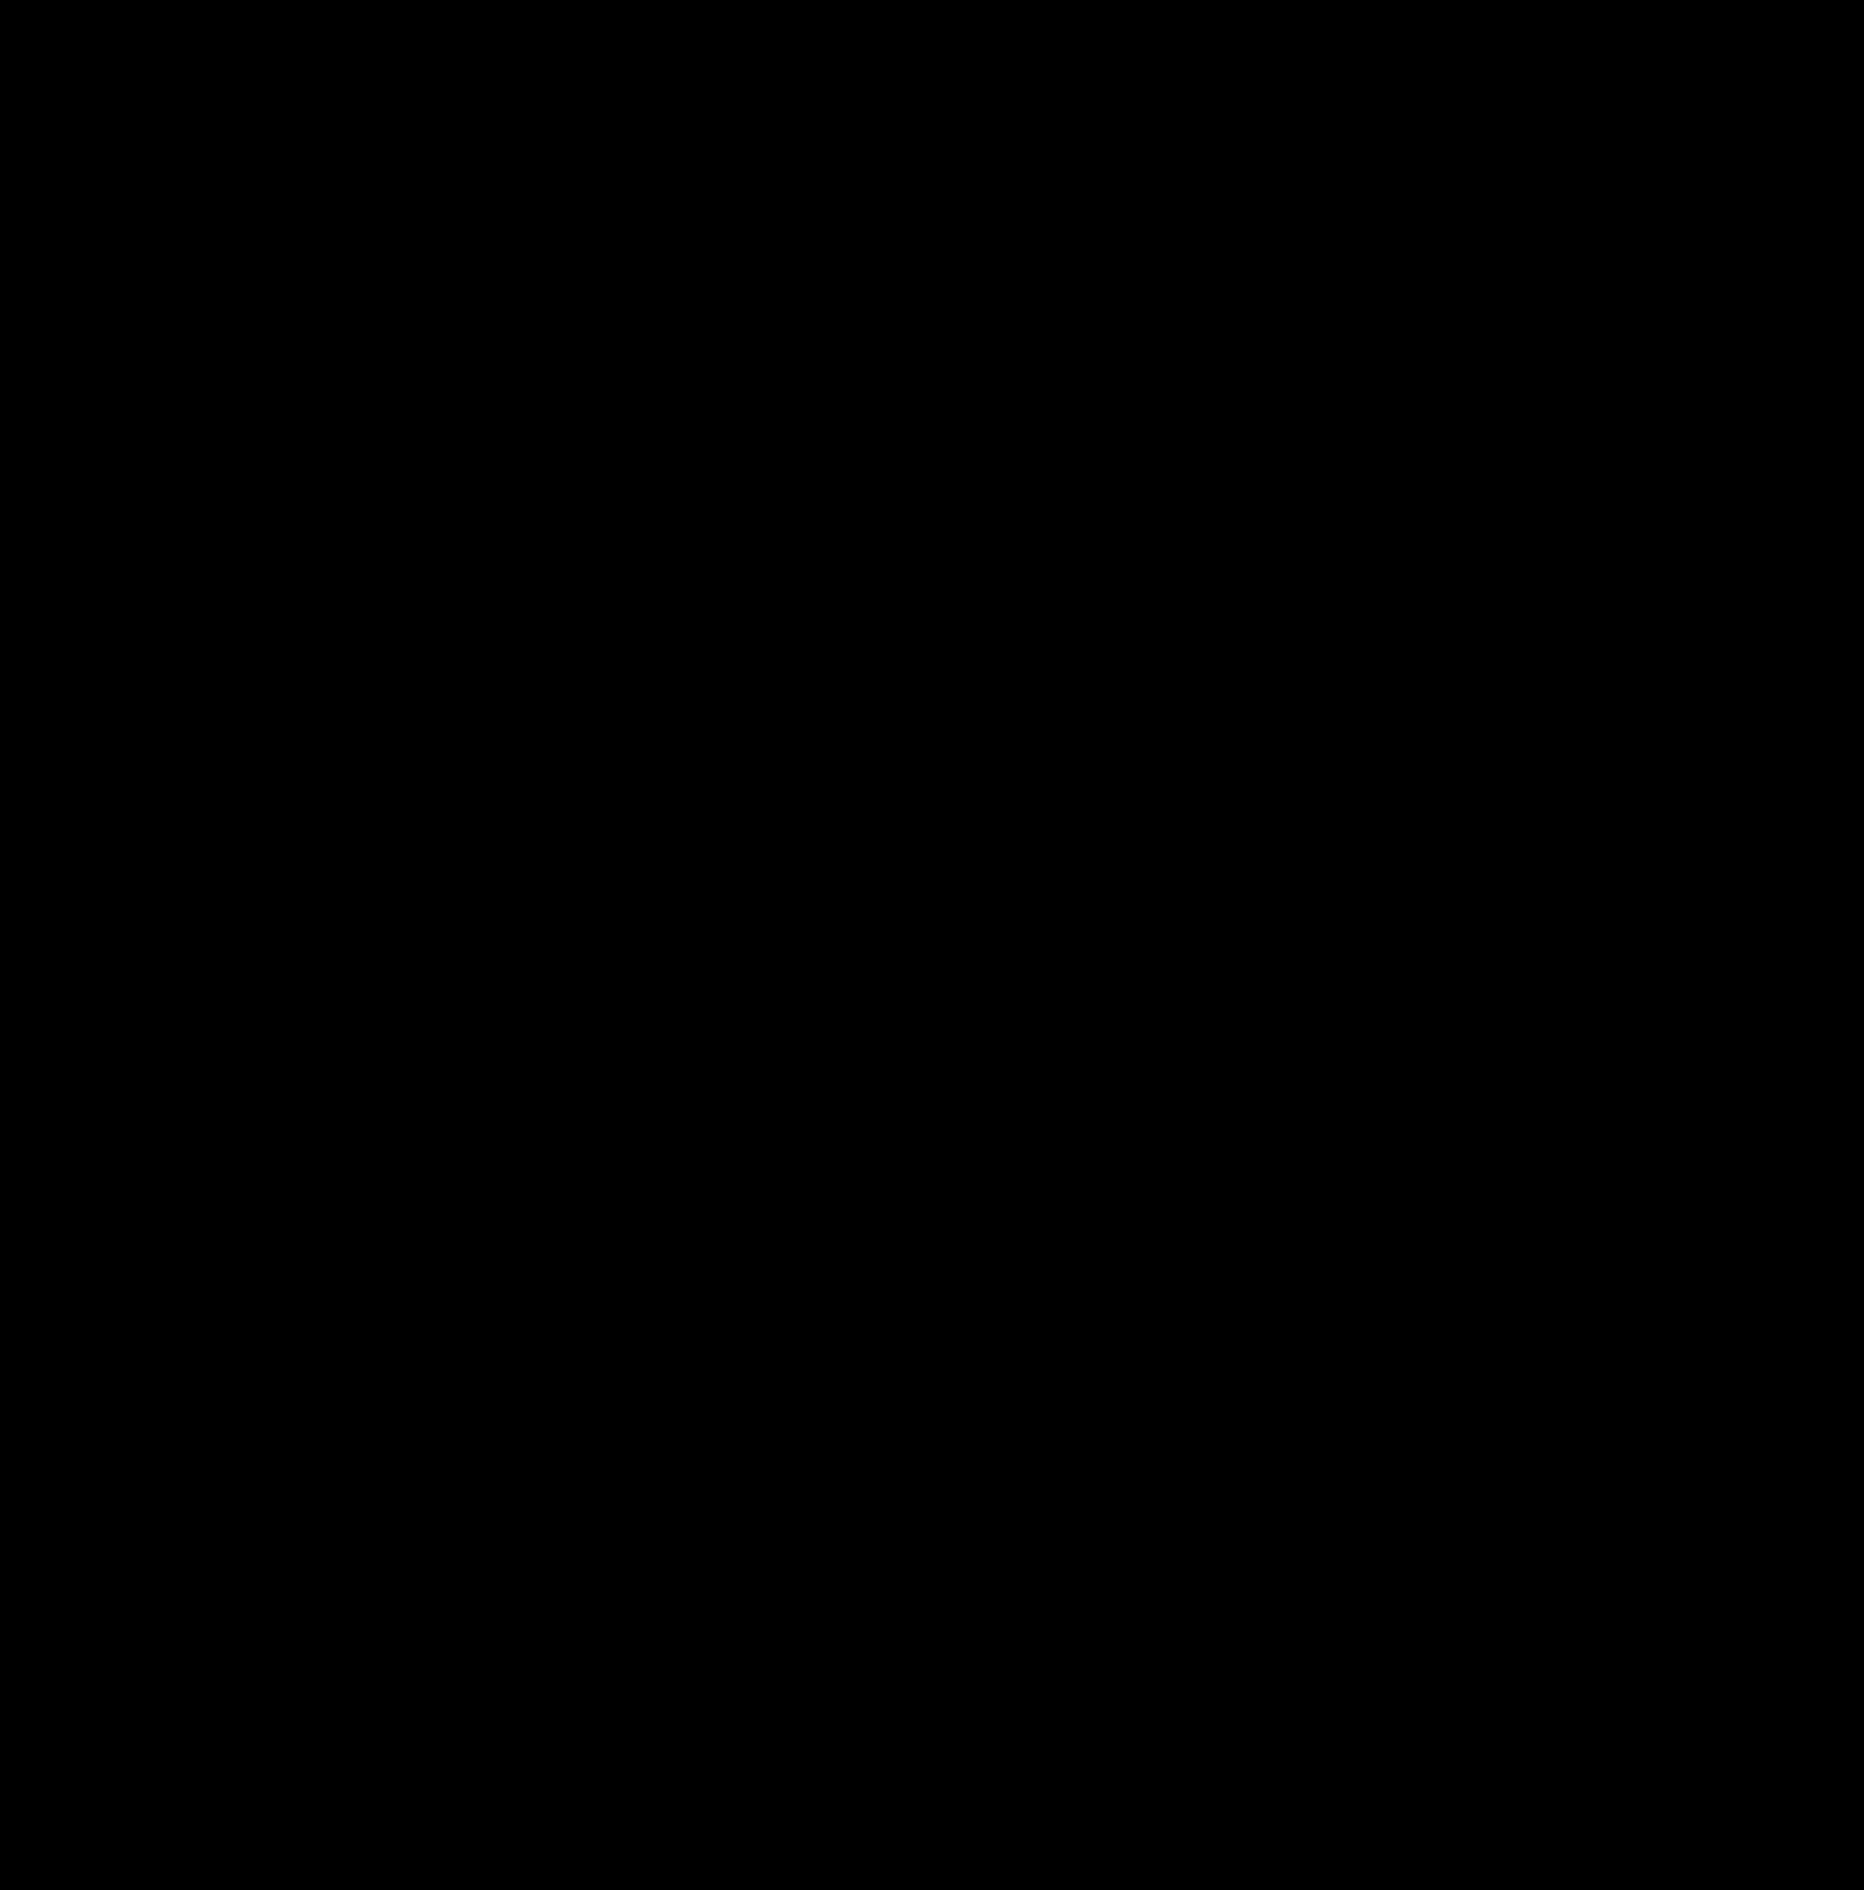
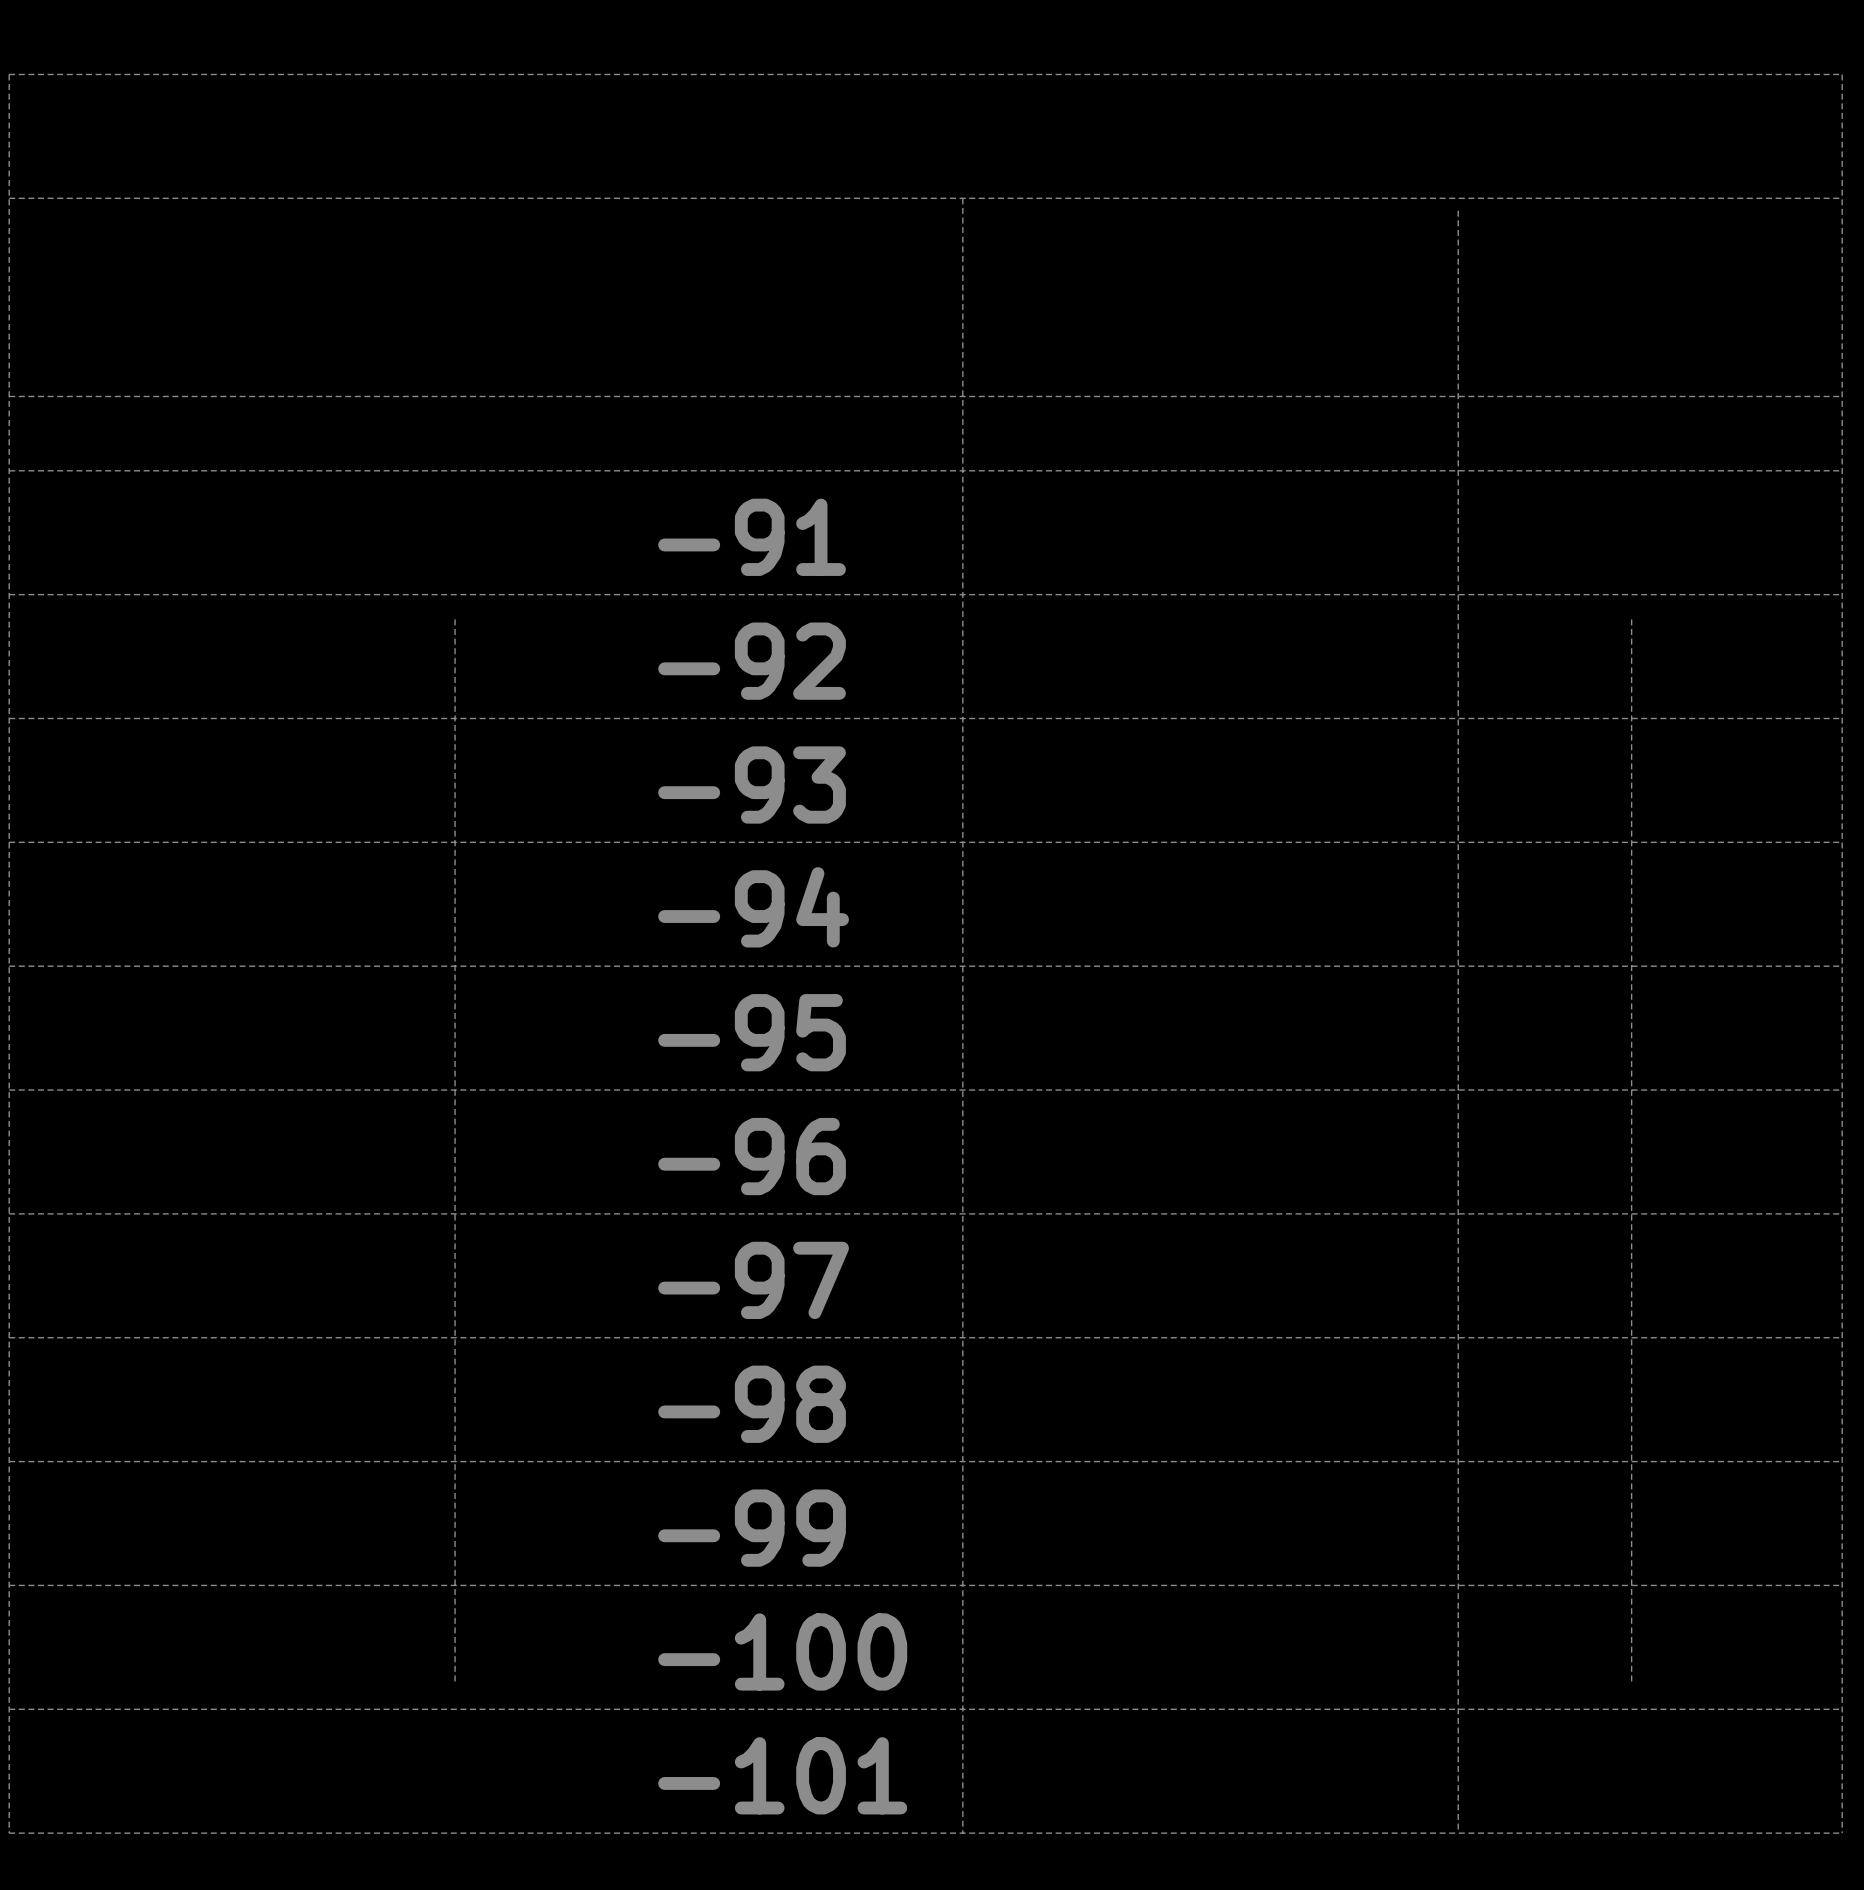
line: none -> (9, 74) (1842, 74) (1842, 1833) (9, 1833) (9, 74)
line: none -> (9, 198) (1842, 198)
line: none -> (962, 198) (962, 1833)
line: none -> (1458, 210) (1458, 1833)
line: none -> (9, 396) (1842, 396)
line: none -> (9, 470) (1842, 470)
text: none -> -91 (752, 537)
line: none -> (9, 594) (1842, 594)
line: none -> (455, 619) (455, 1684)
line: none -> (1631, 619) (1631, 1684)
text: none -> -92 (752, 661)
line: none -> (9, 718) (1842, 718)
text: none -> -93 (752, 785)
line: none -> (9, 842) (1842, 842)
text: none -> -94 (753, 907)
line: none -> (9, 966) (1842, 966)
text: none -> -95 (752, 1032)
line: none -> (9, 1090) (1842, 1090)
text: none -> -96 (752, 1156)
line: none -> (9, 1213) (1842, 1213)
text: none -> -97 (753, 1280)
line: none -> (9, 1337) (1842, 1337)
text: none -> -98 (752, 1404)
line: none -> (9, 1461) (1842, 1461)
text: none -> -99 (752, 1528)
line: none -> (9, 1585) (1842, 1585)
text: none -> -100 (782, 1651)
line: none -> (9, 1709) (1842, 1709)
text: none -> -101 (782, 1775)

